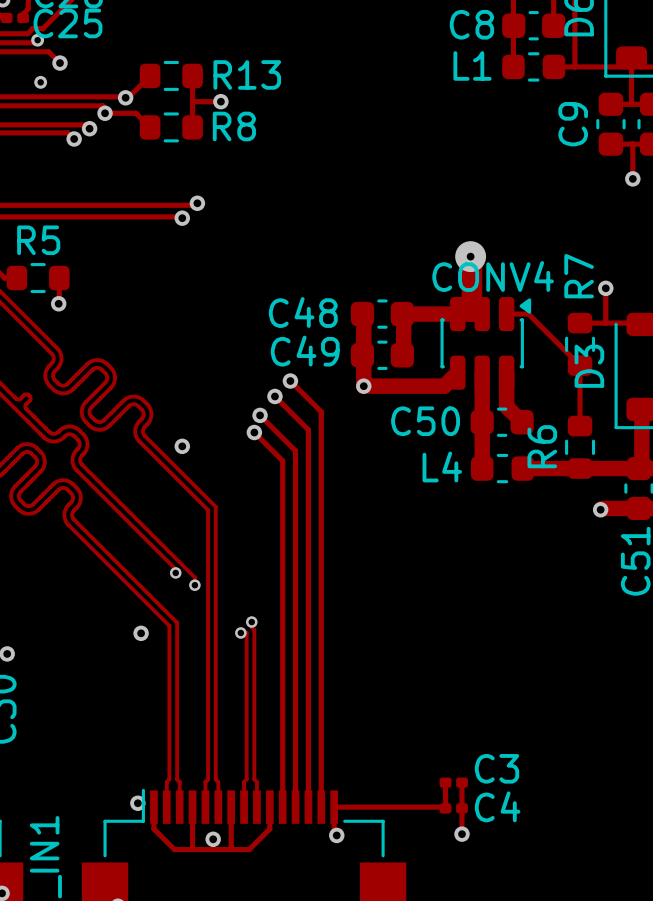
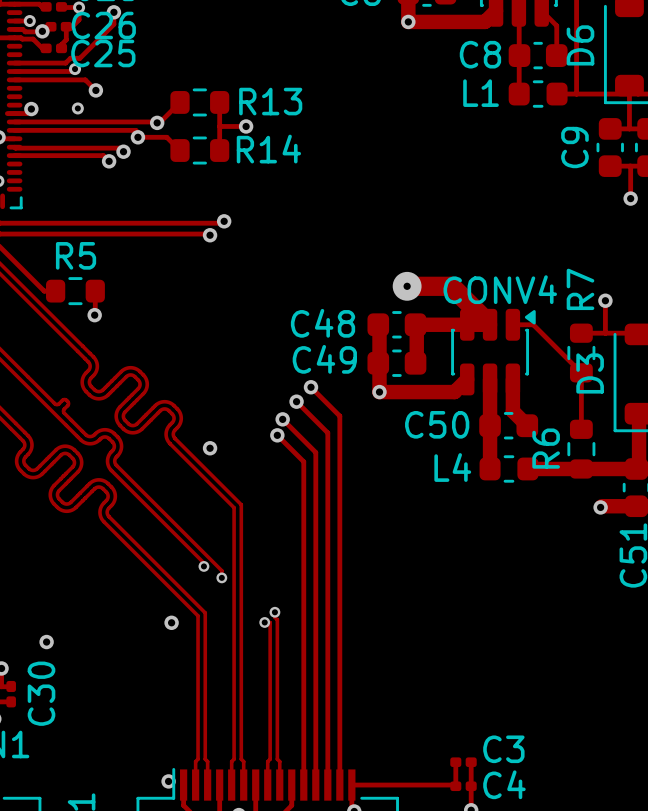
R8 name: R8 (234, 126) -> R14 (268, 149)
track: (470, 256) (471, 303) -> (407, 286) (451, 286) (480, 315)
via position: (470, 256) -> (407, 286)

